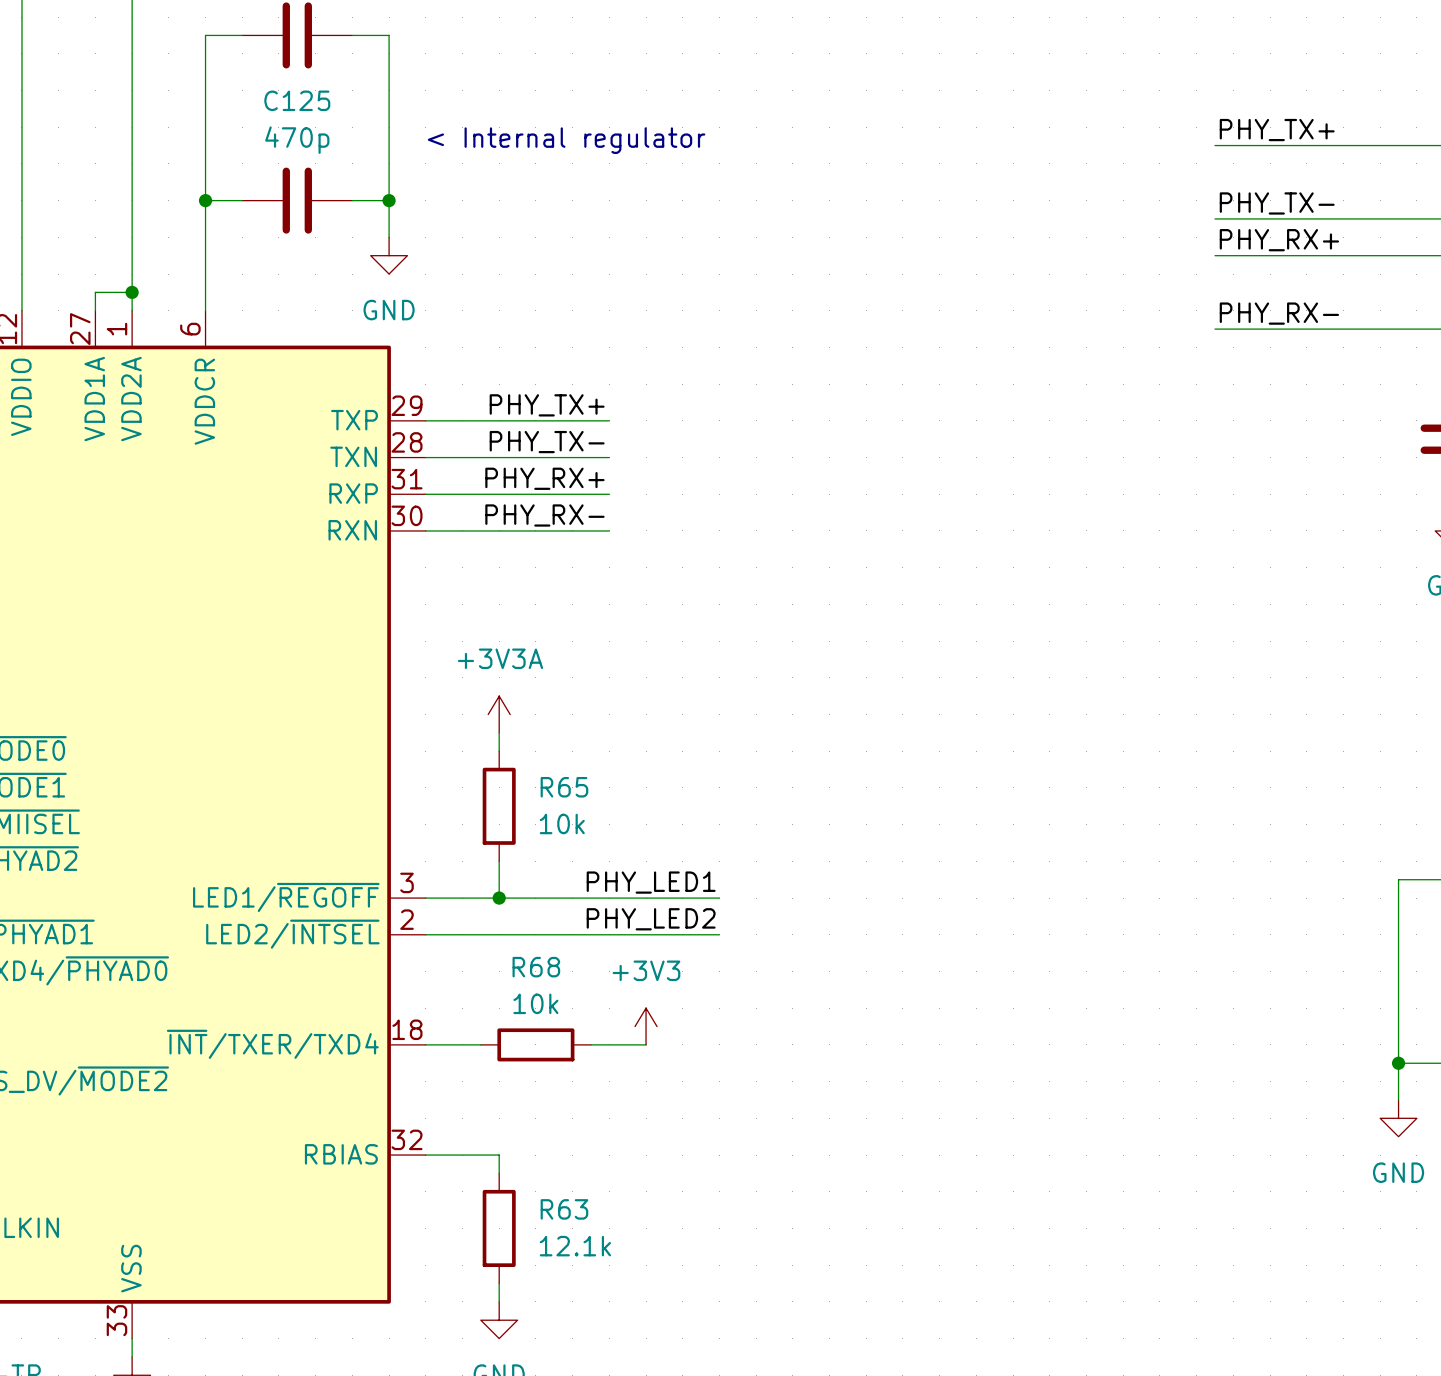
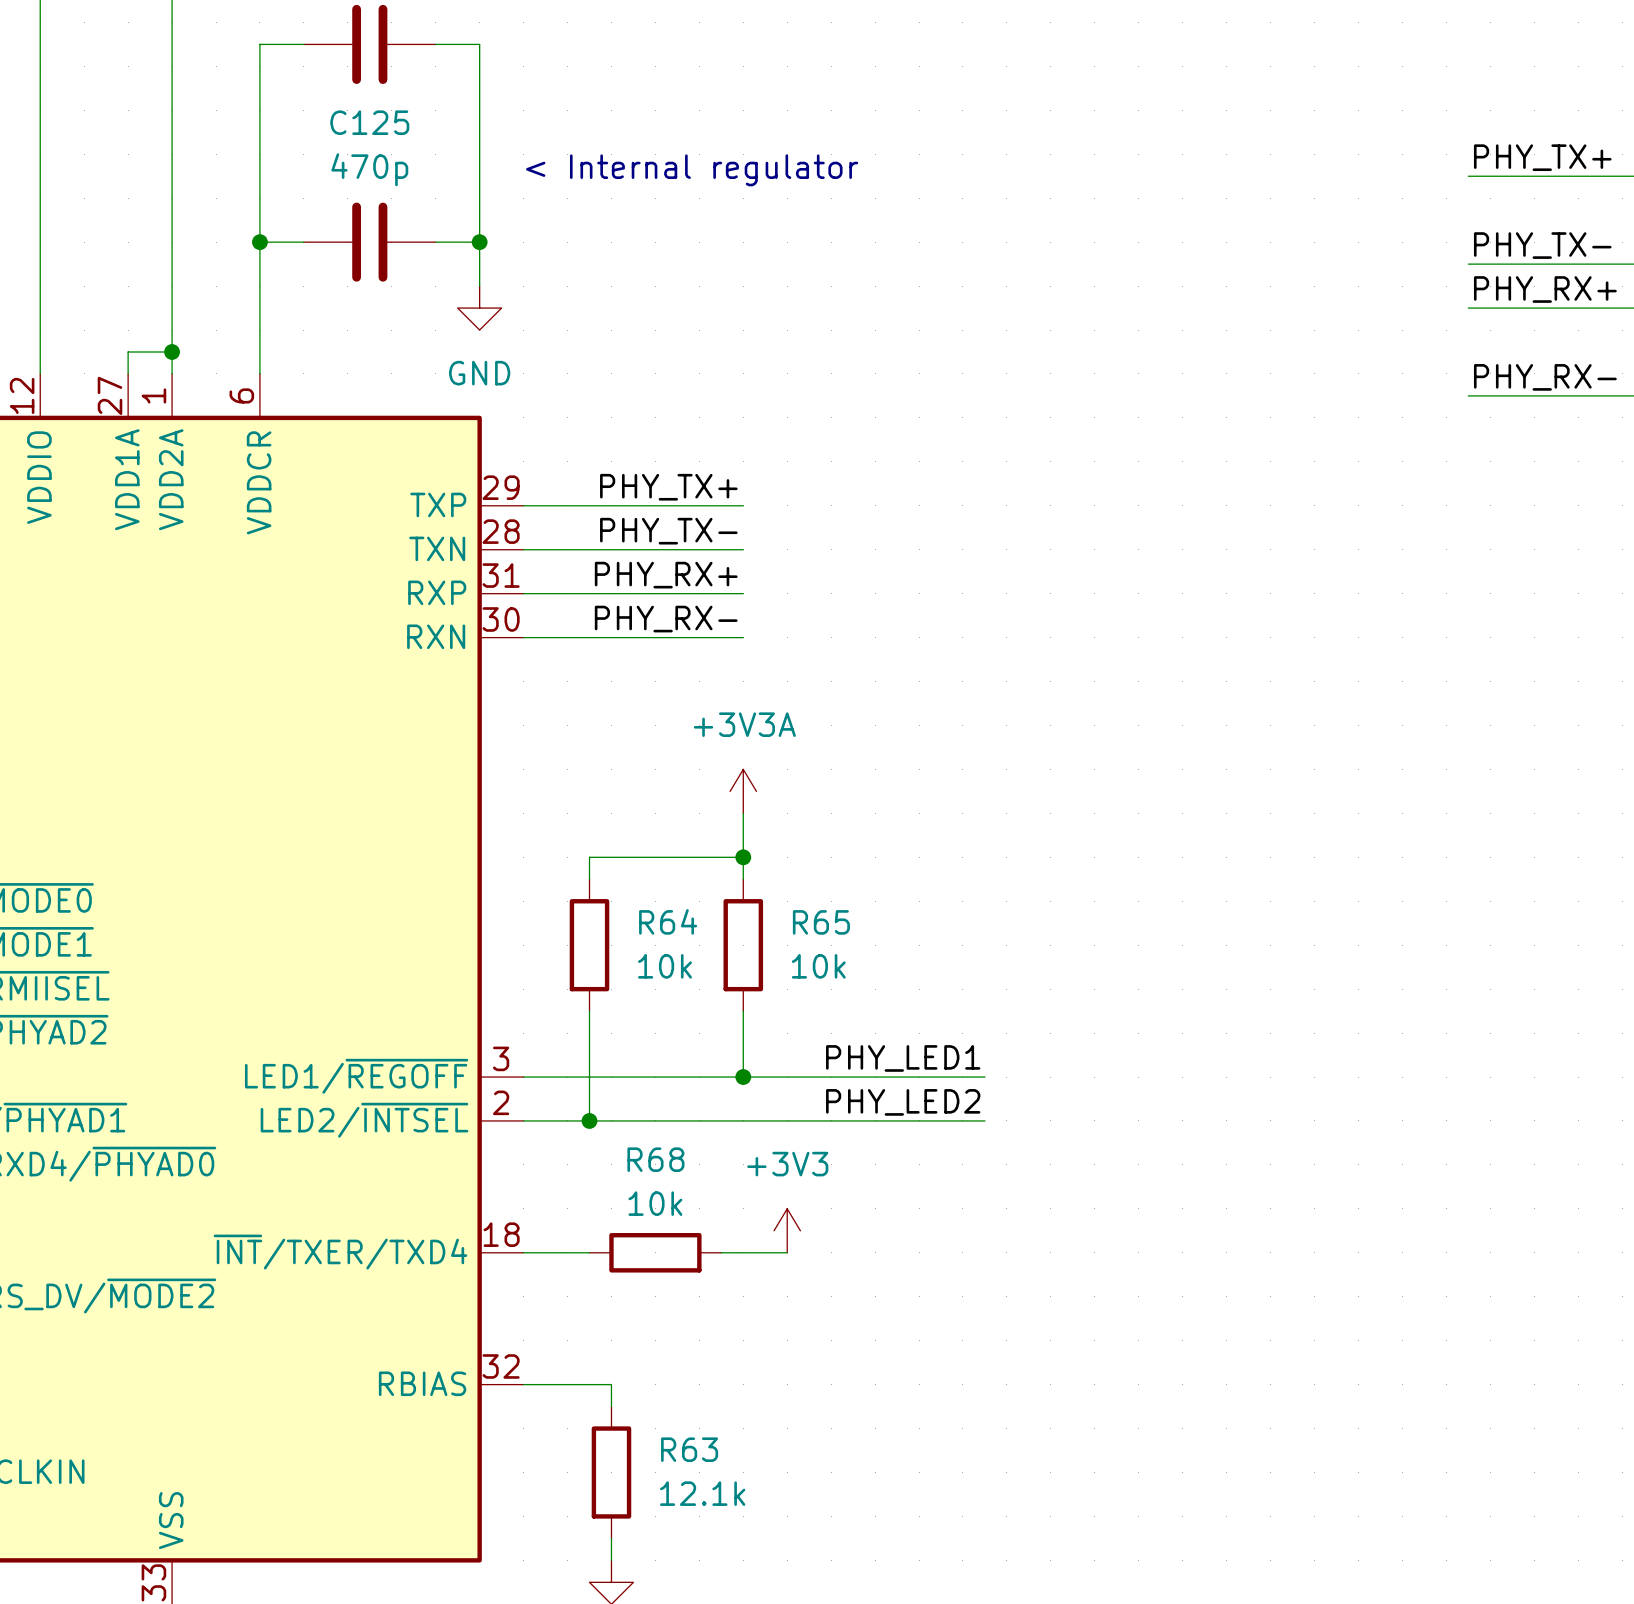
wire: none -> (743, 813) (743, 879)
power symbol position: +3V3A (499, 714) -> +3V3A (743, 791)
wire: none -> (743, 857) (589, 857) (589, 879)
junction: none -> (743, 857)
wire: (499, 732) (499, 751) -> none
R64: none -> 10k (589, 945)
R65 position: (499, 806) -> (743, 945)
wire: none -> (589, 1011) (589, 1120)
wire: none -> (743, 1011) (743, 1077)
wire: (499, 861) (499, 898) -> none
label position: PHY_LED1 (651, 882) -> PHY_LED1 (903, 1058)
junction position: (499, 898) -> (589, 1120)
junction: none -> (743, 1077)
wire: none -> (875, 1077) (984, 1077)
label position: PHY_LED2 (651, 919) -> PHY_LED2 (903, 1102)
wire: none -> (875, 1120) (984, 1120)

